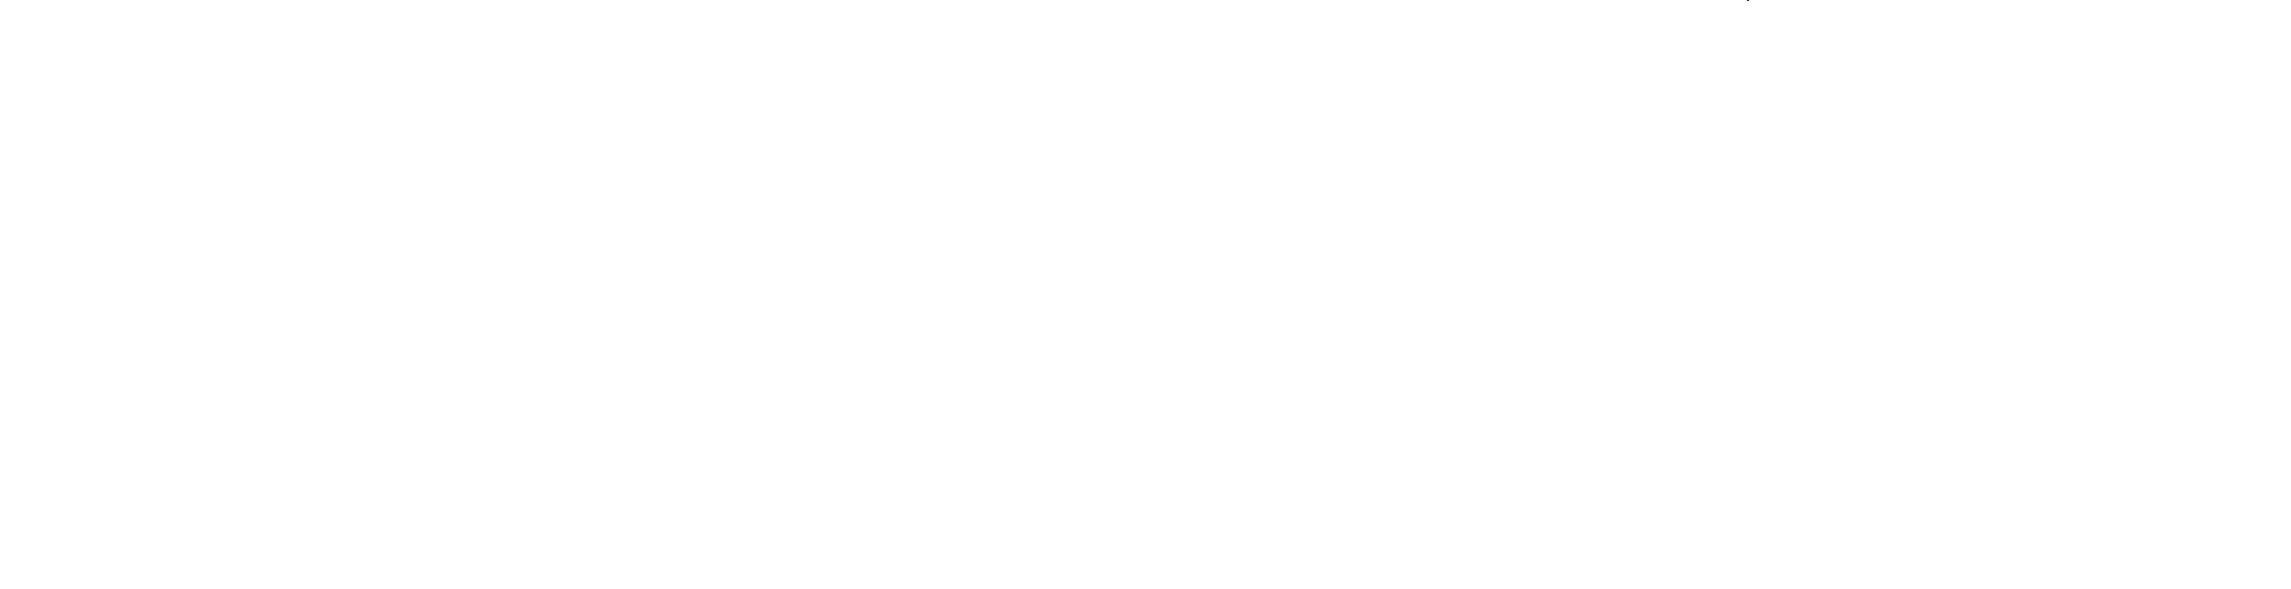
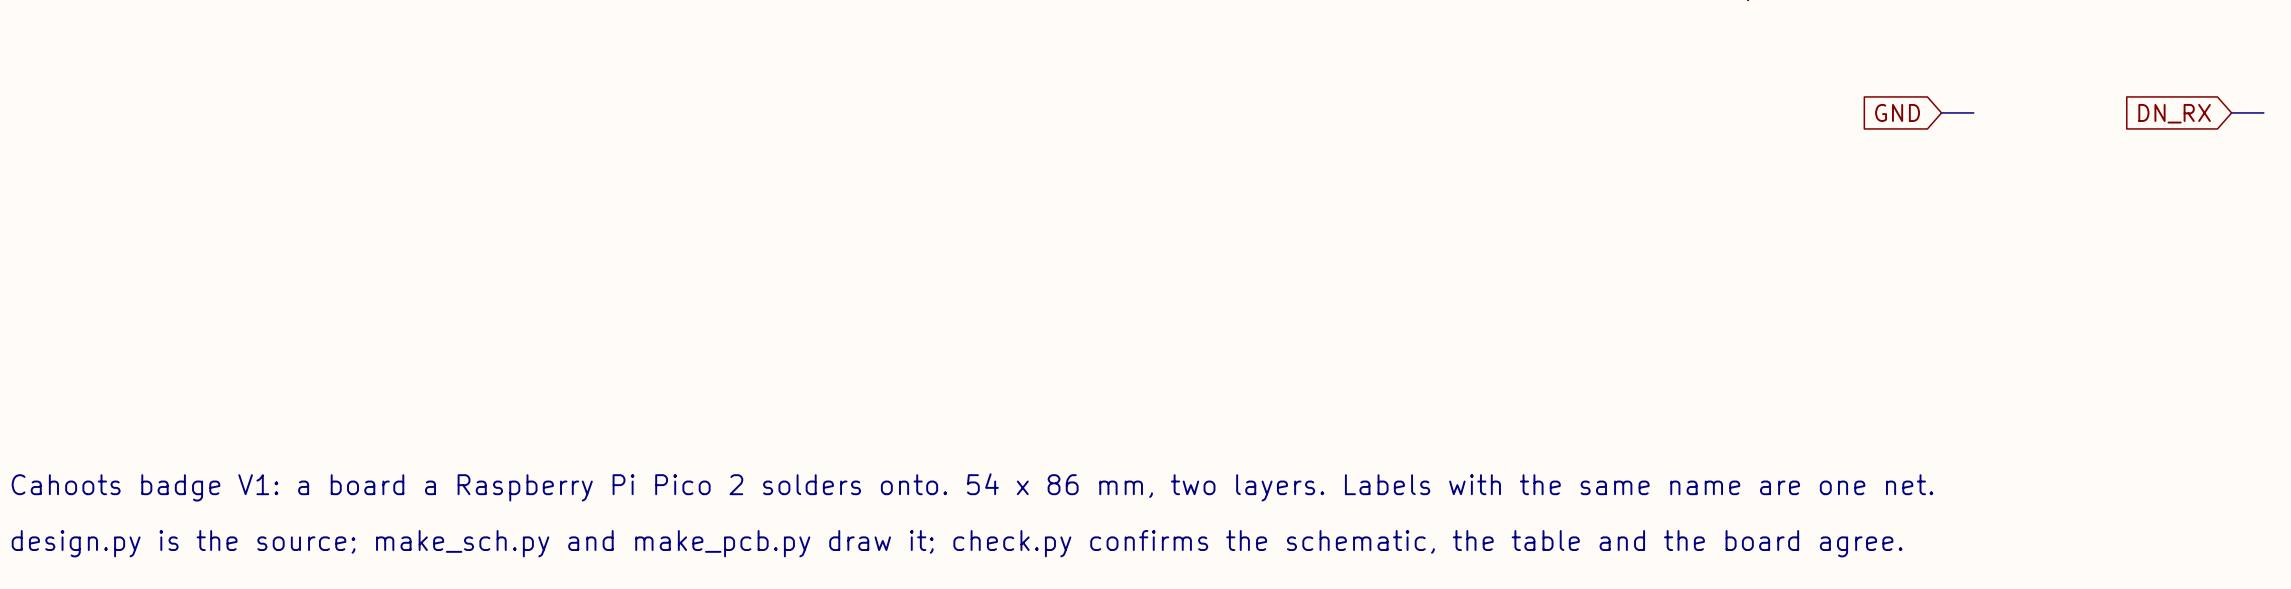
global label: none -> GND (1897, 112)
wire: none -> (1941, 112) (1973, 112)
wire: none -> (2231, 112) (2263, 112)
global label: none -> DN_RX (2174, 113)
text: none -> Cahoots badge V1: a board a Raspberry Pi Pico 2 solders onto. 54 x 86 mm, two layers. Labels with the same name are one net. (972, 487)
text: none -> design.py is the source; make_sch.py and make_pcb.py draw it; check.py confirms the schematic, the table and the board agree. (957, 543)

